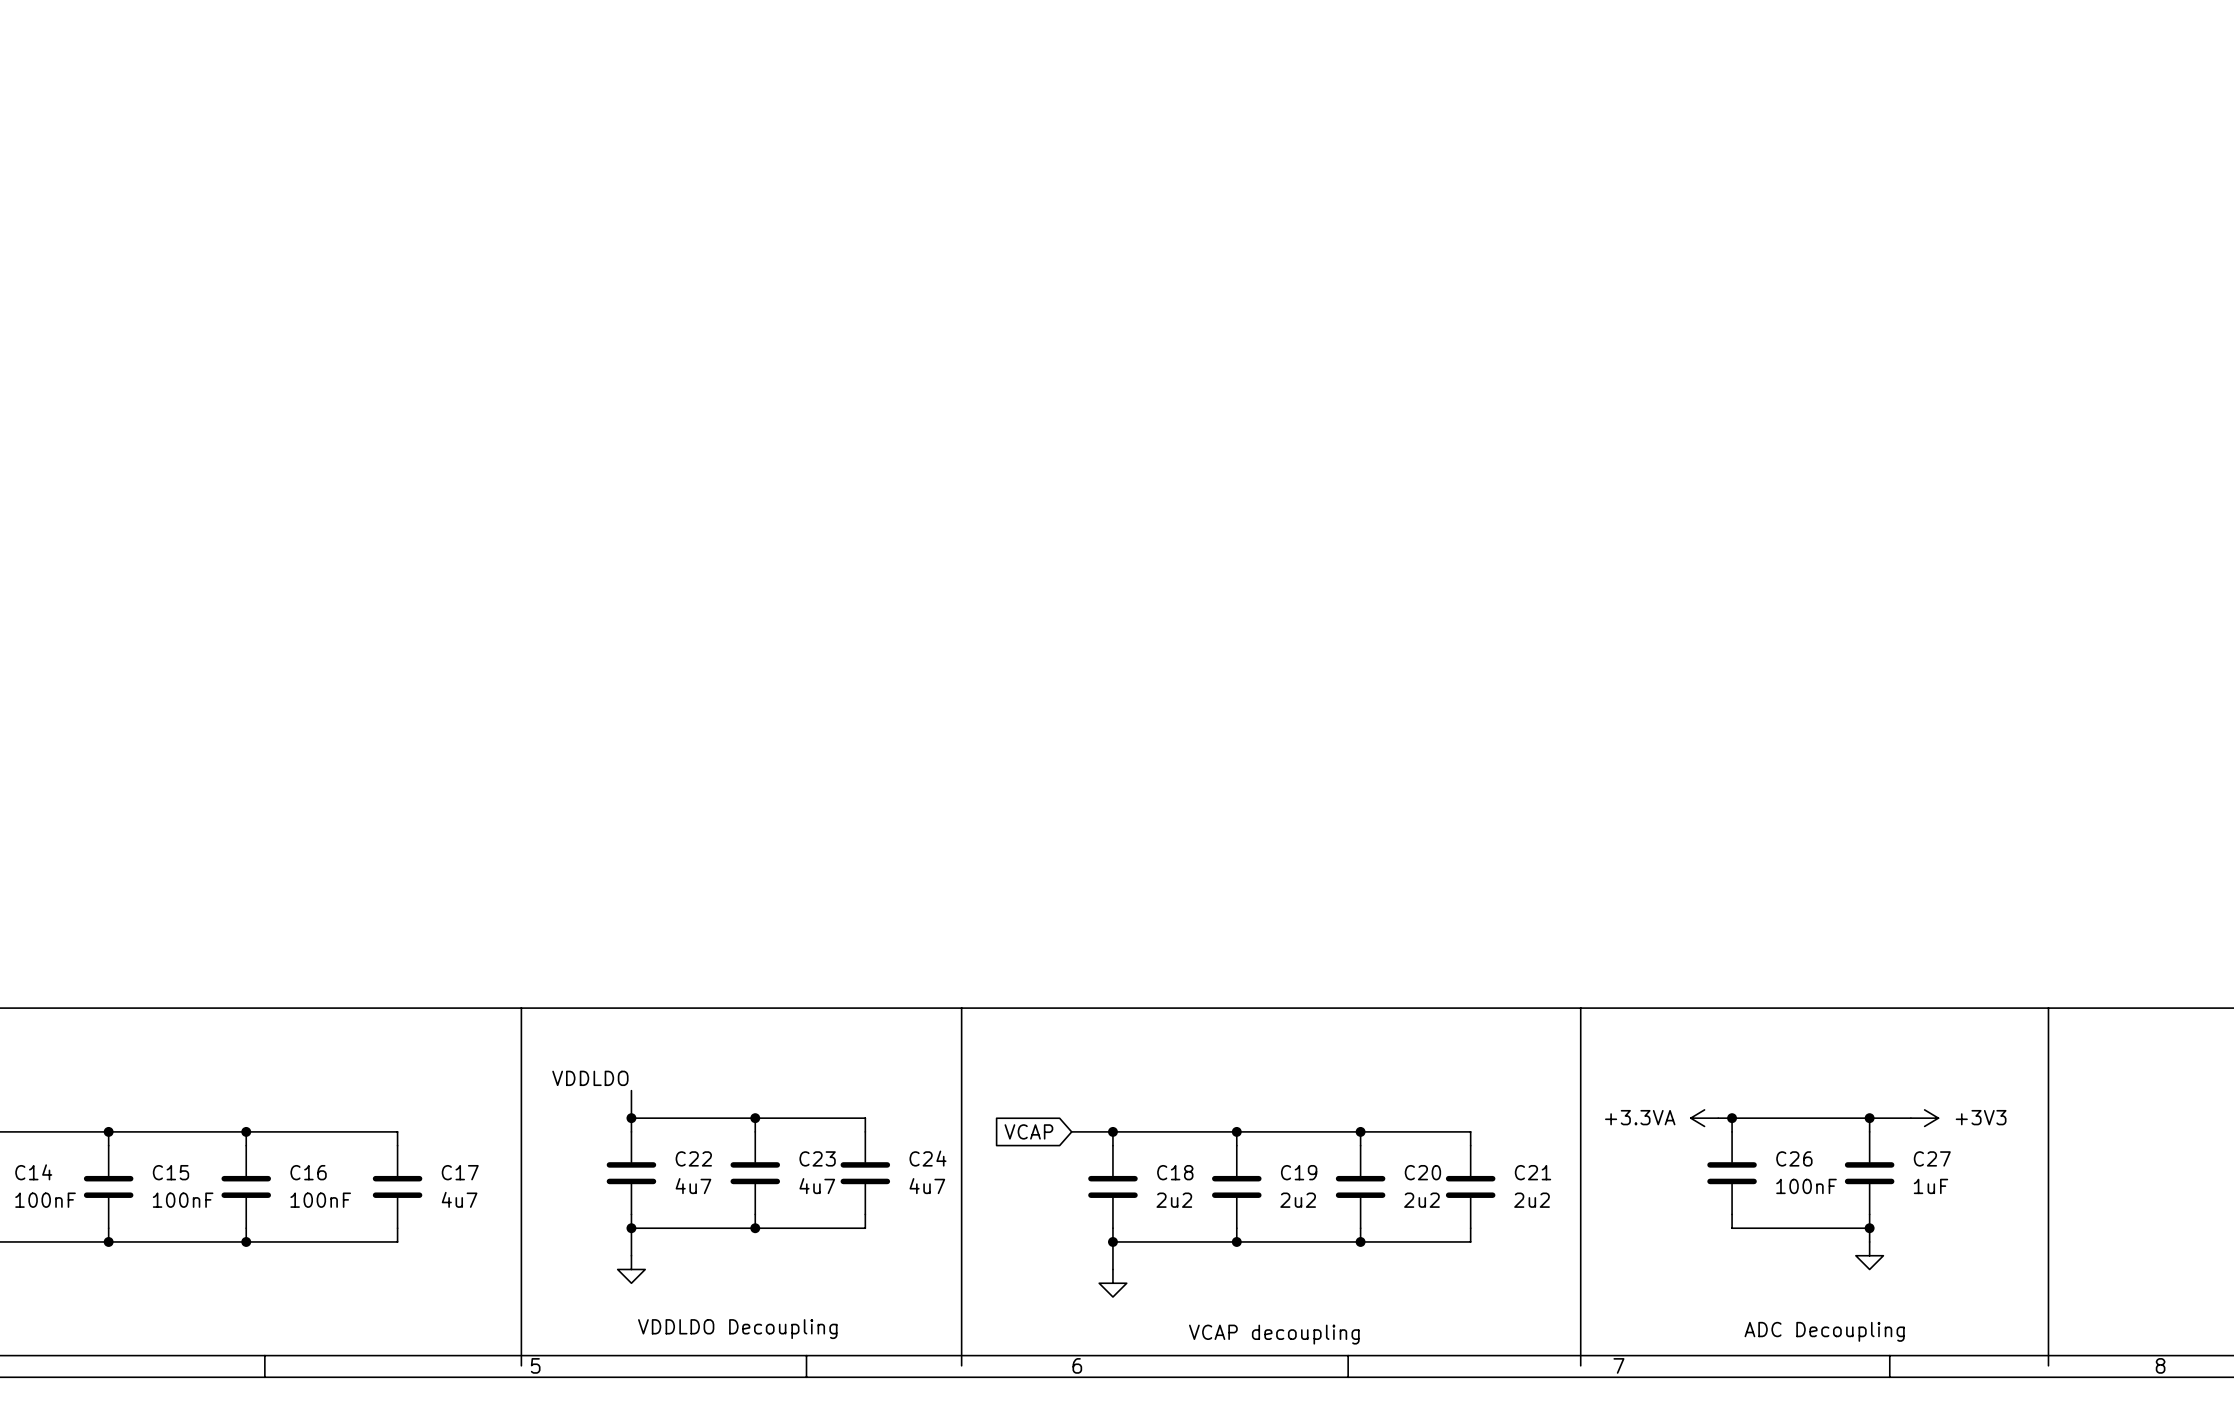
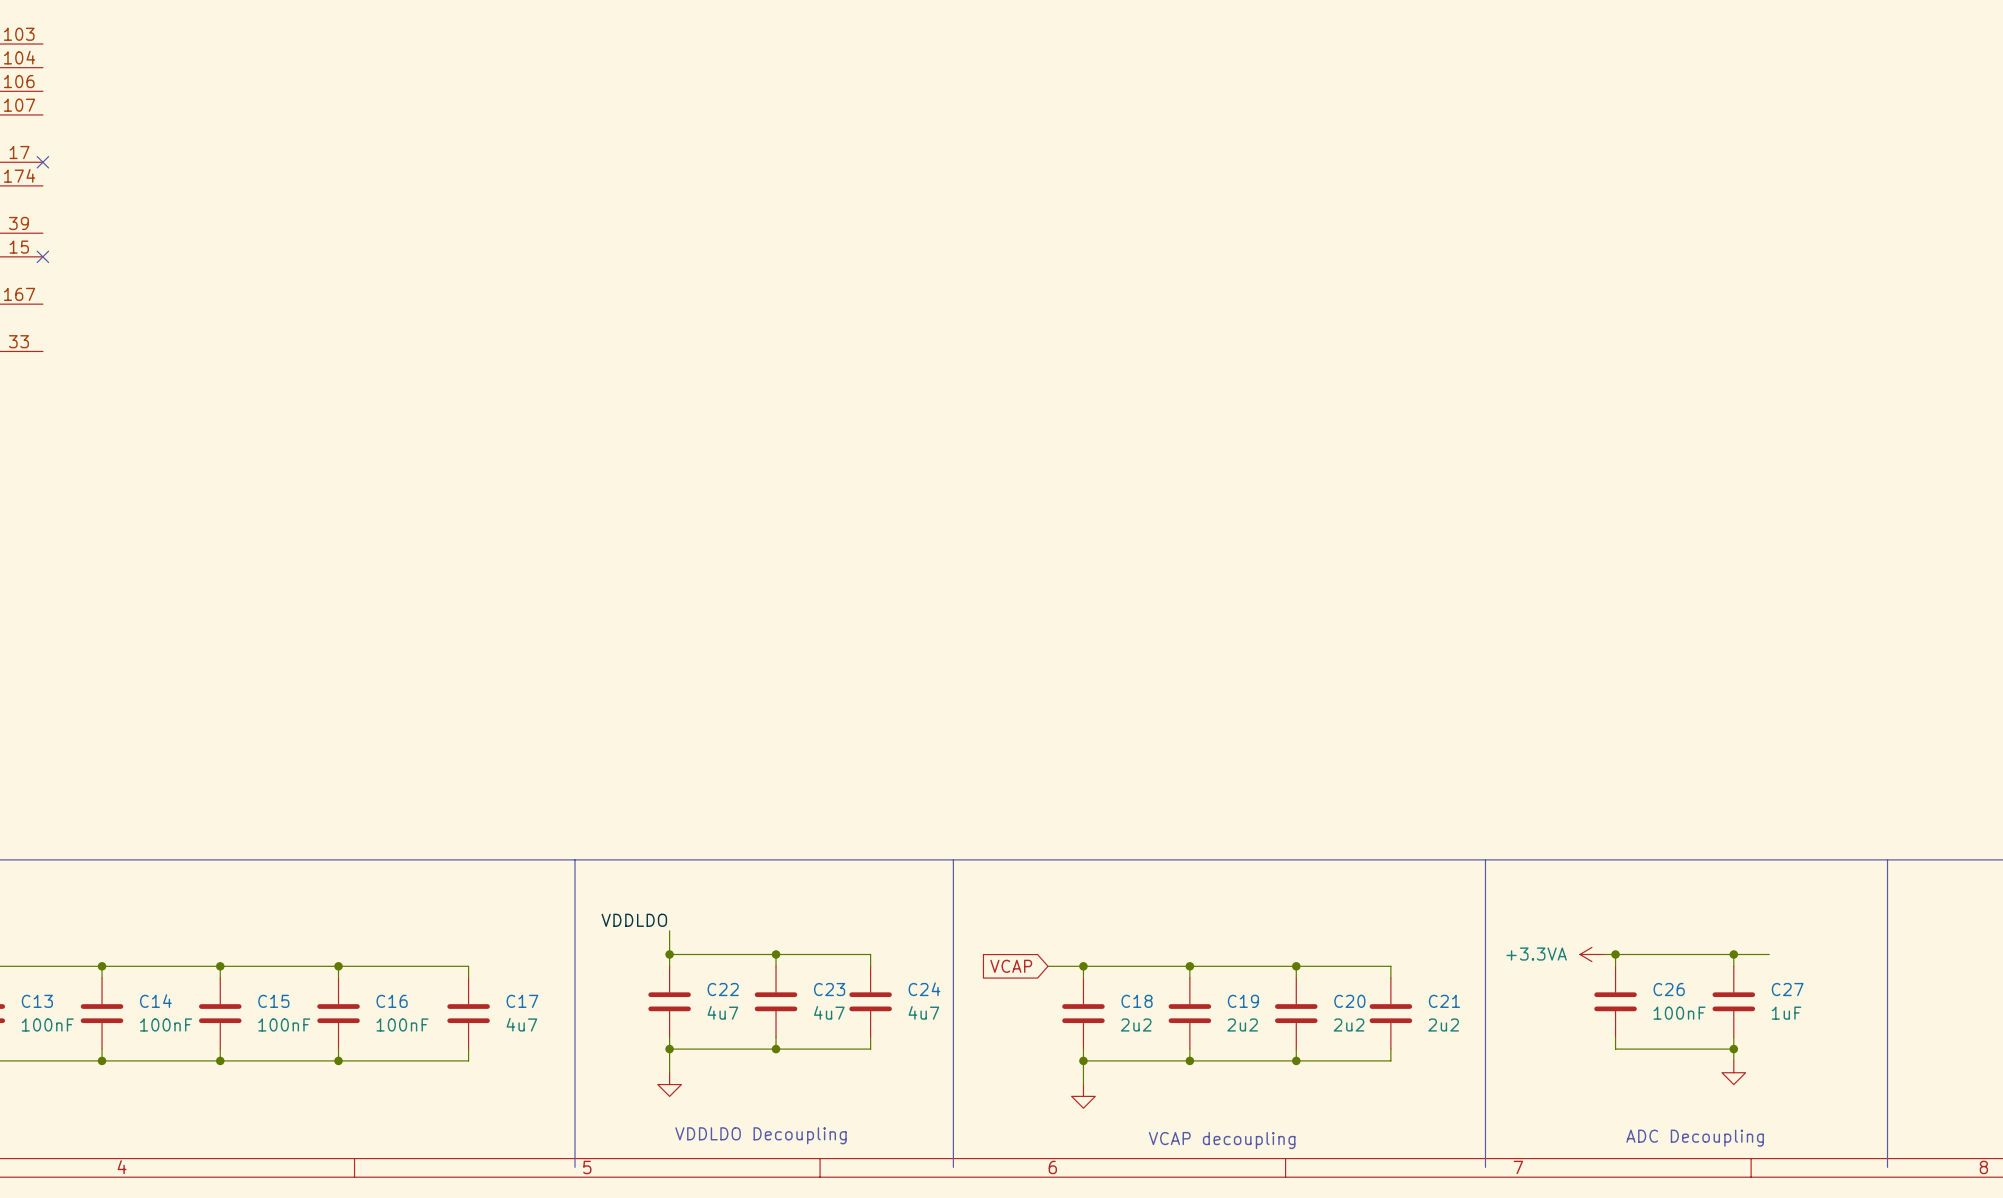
power symbol: +3V3 (1924, 1118) -> none

